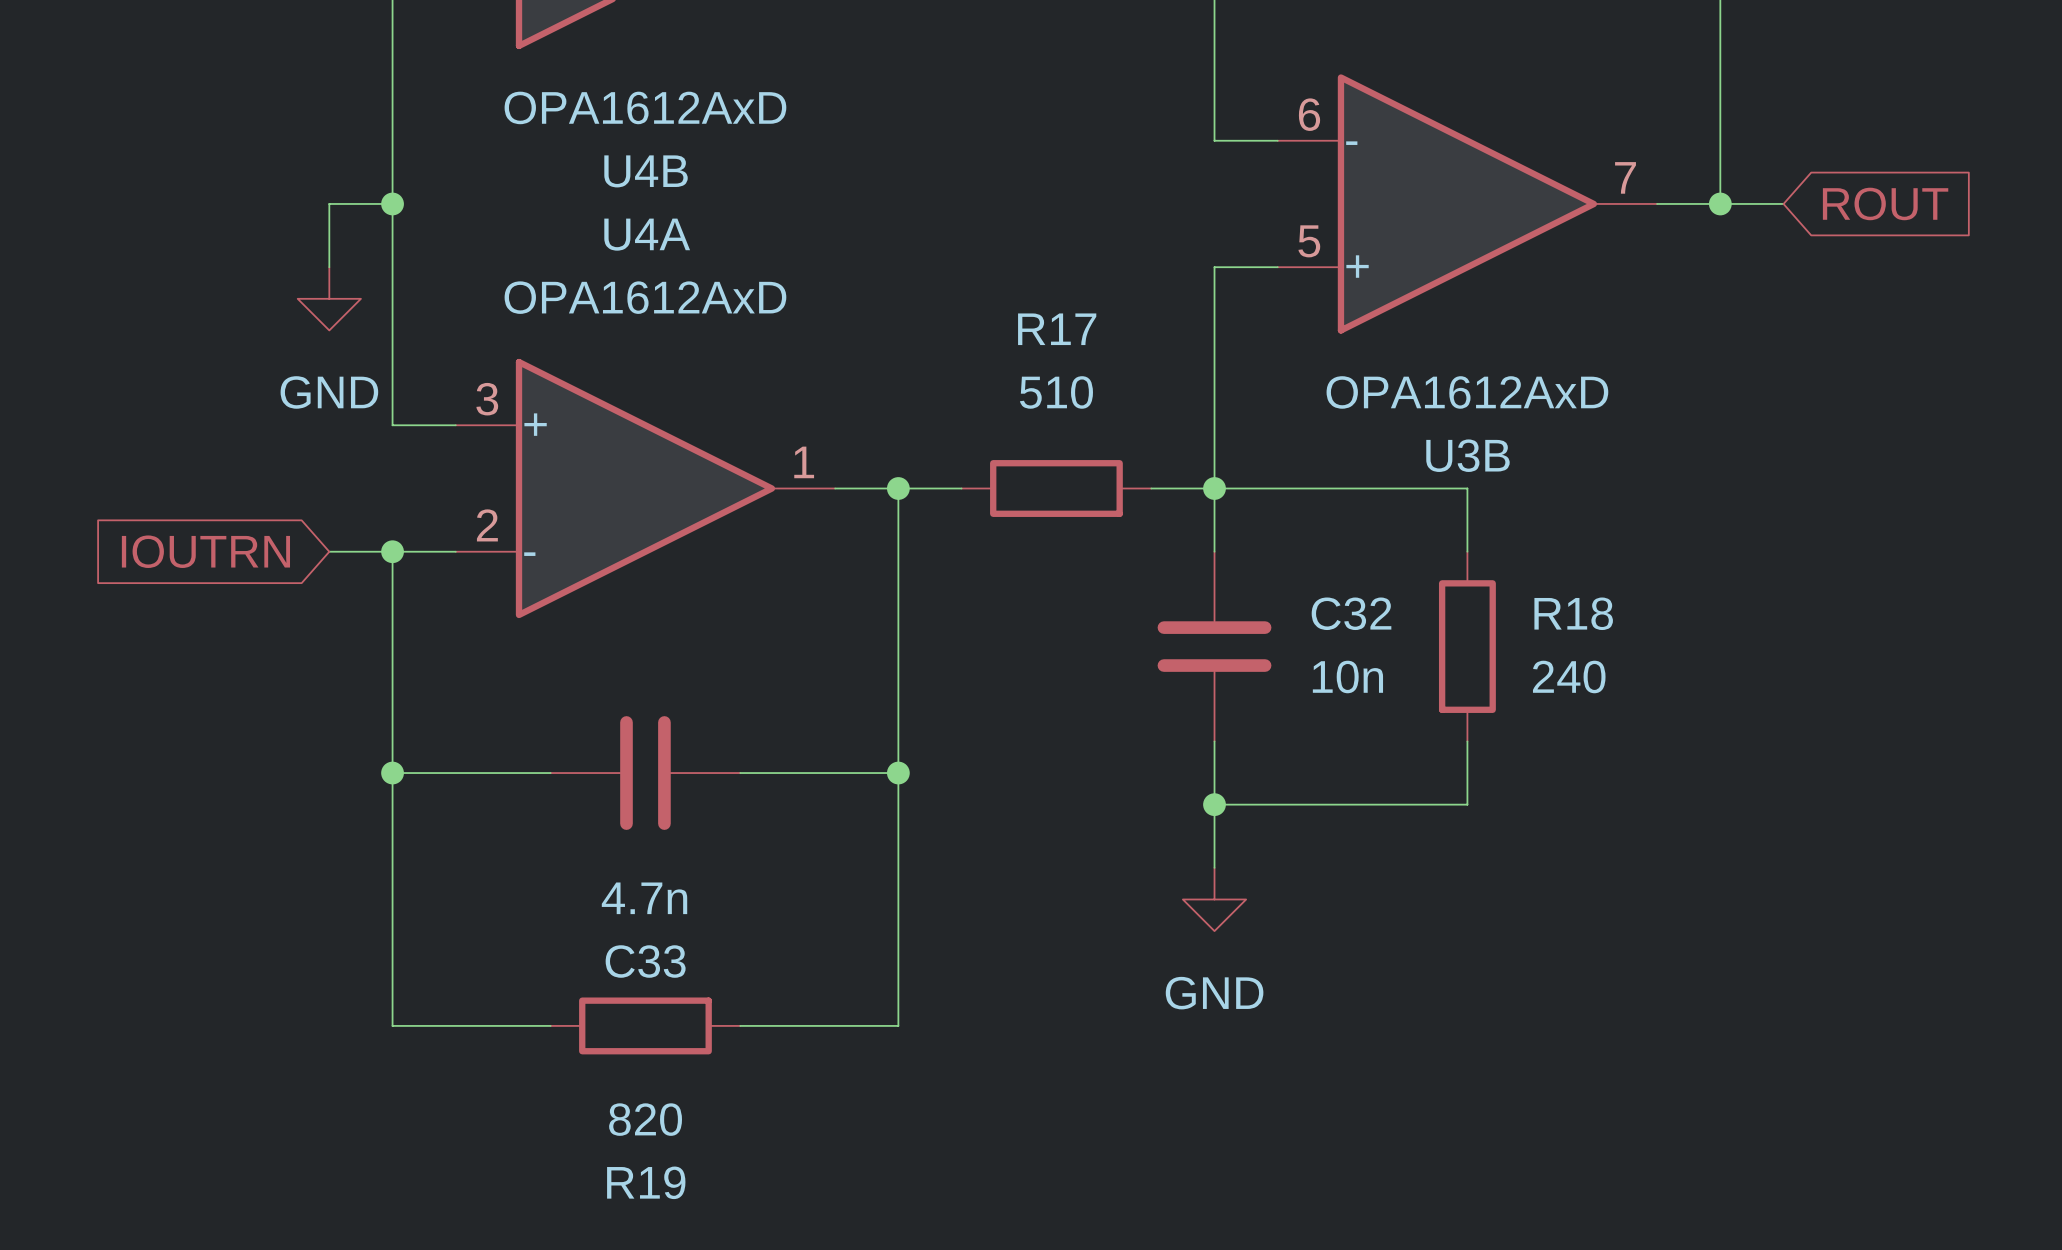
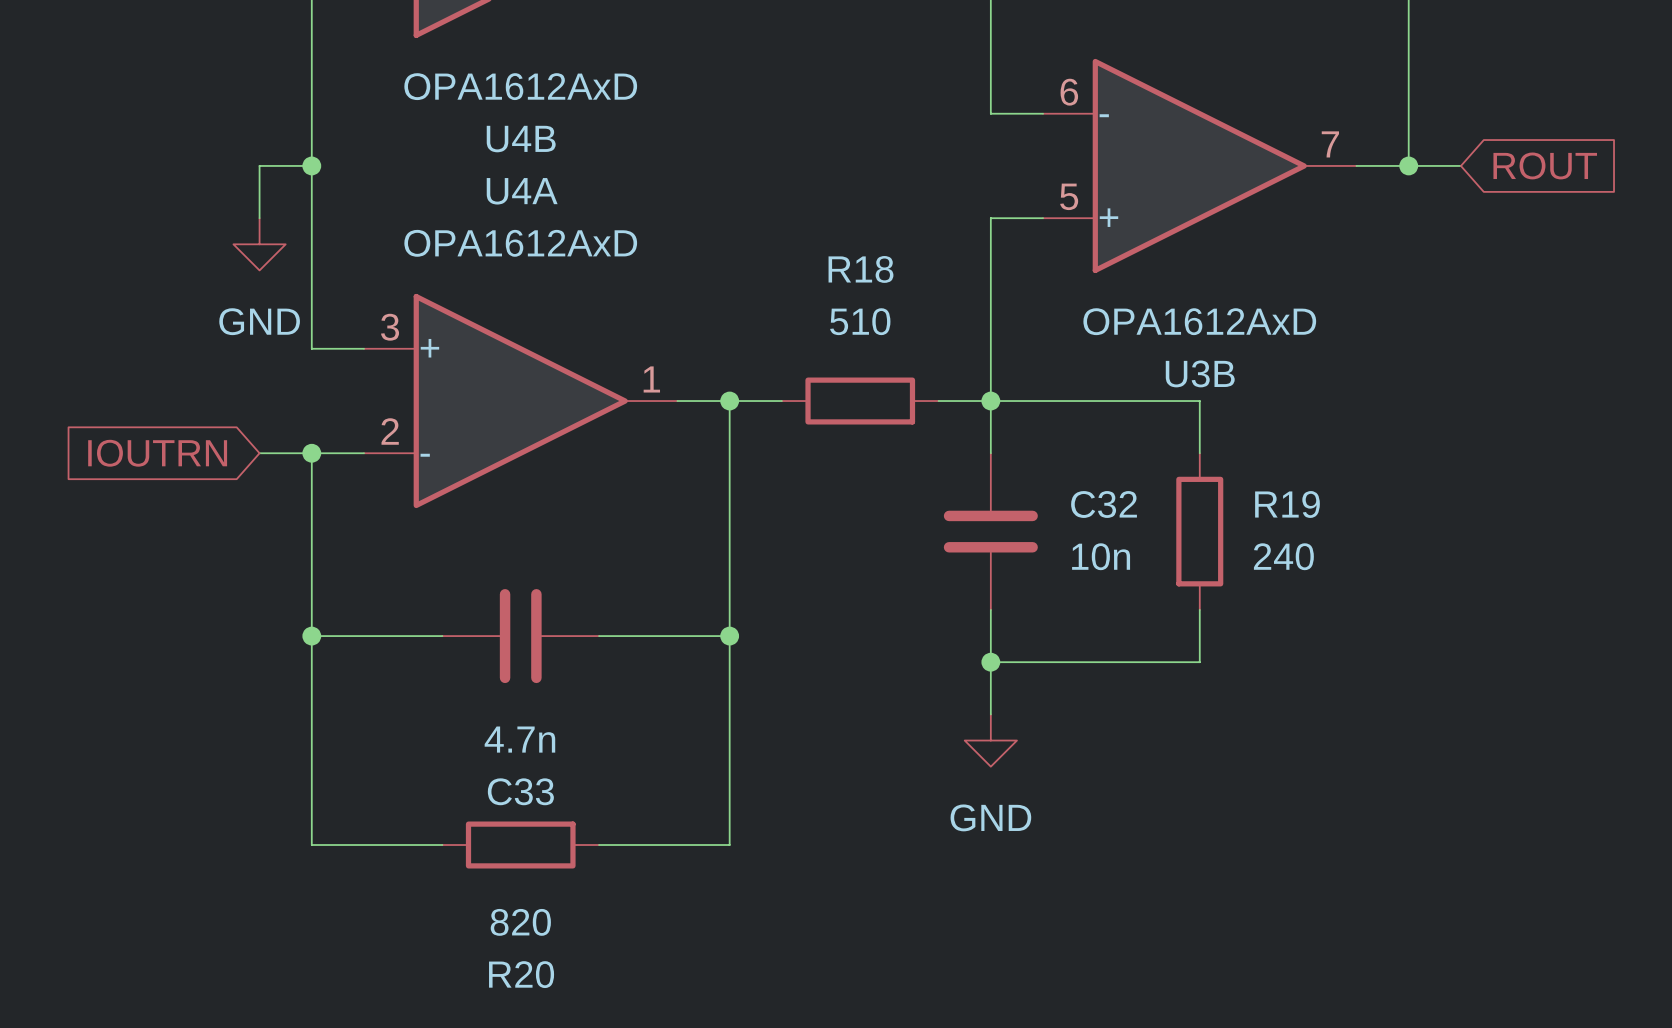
R17 name: R17 (1057, 329) -> R18 (860, 269)
R18 name: R18 (1573, 613) -> R19 (1287, 504)
R19 name: R19 (646, 1182) -> R20 (521, 974)

